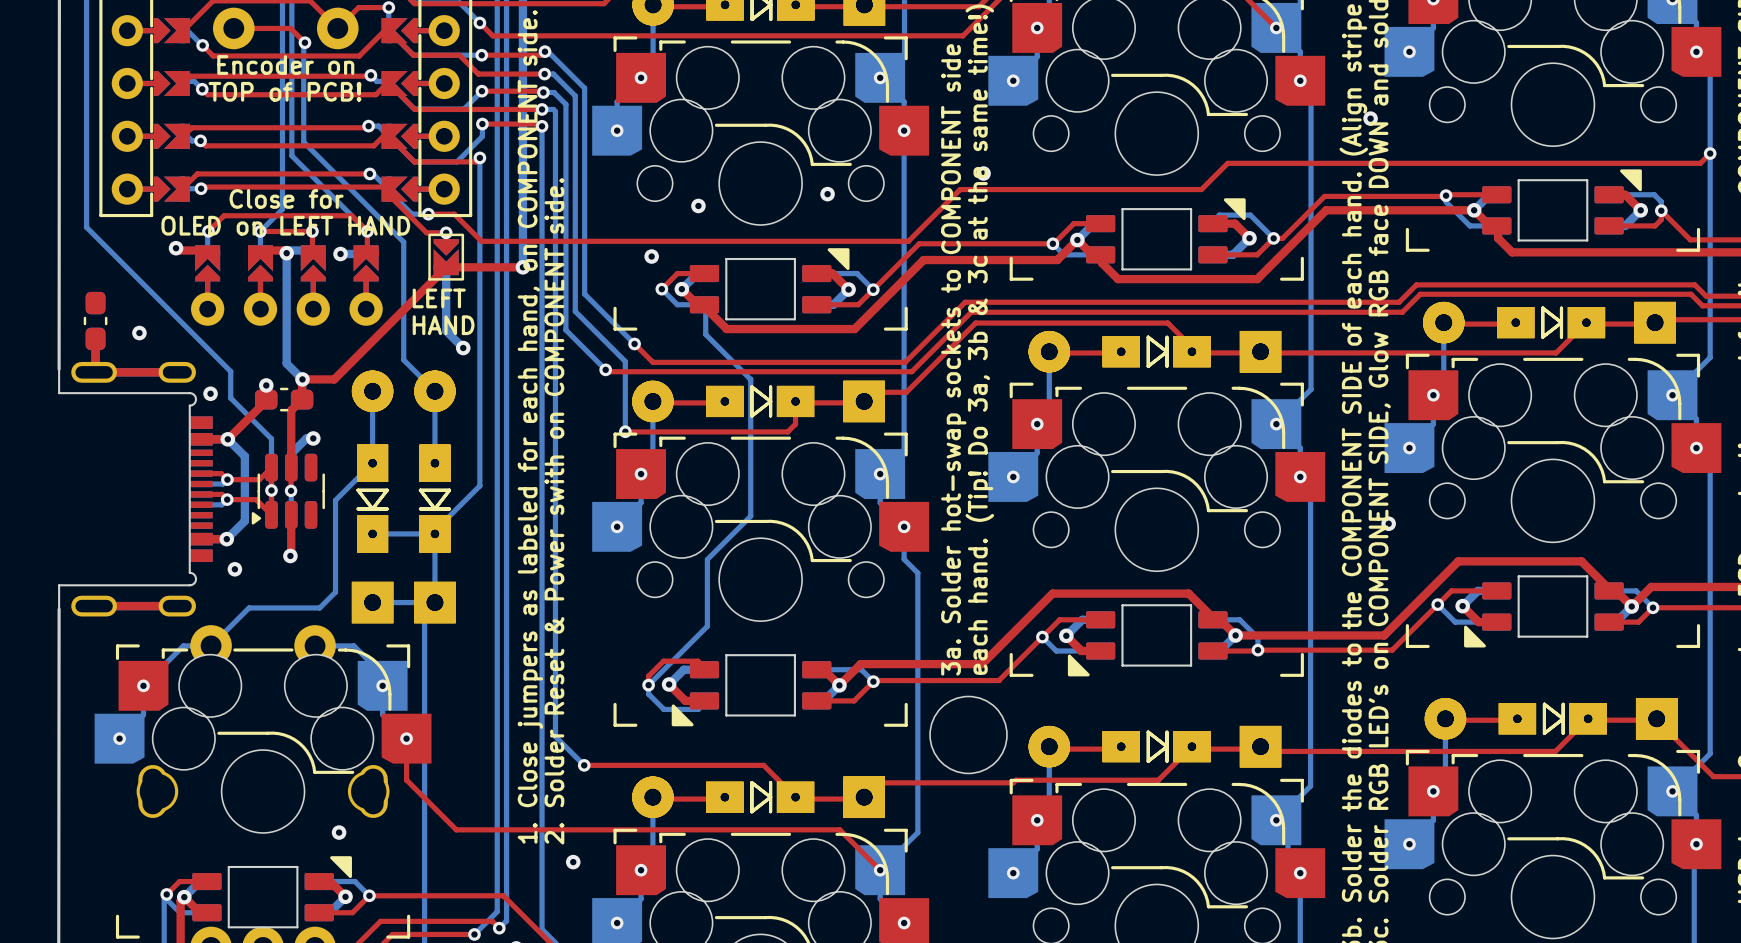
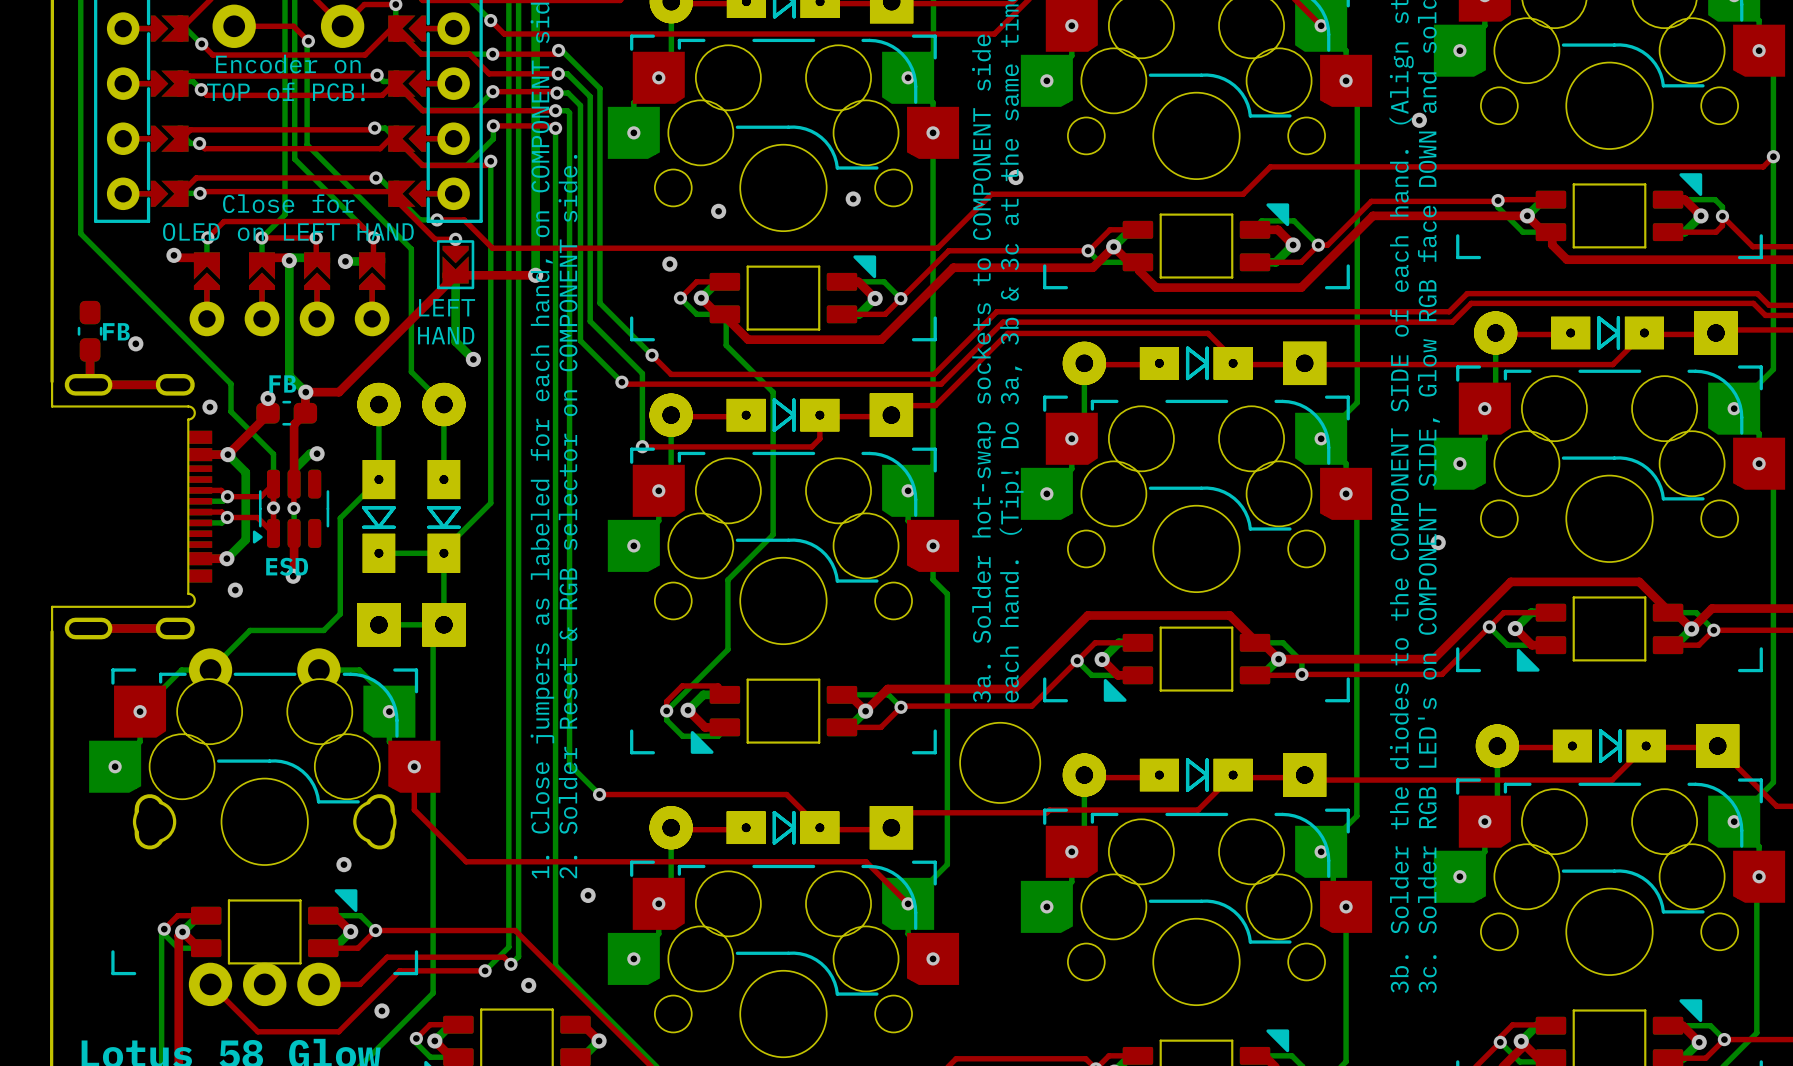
text: none -> FB (116, 331)
text: none -> FB (282, 383)
text: 2. Solder Reset & Power swith on COMPONENT side. (554, 511) -> 2. Solder Reset & RGB selector on COMPONENT side. (567, 516)
text: none -> ESD (287, 566)

